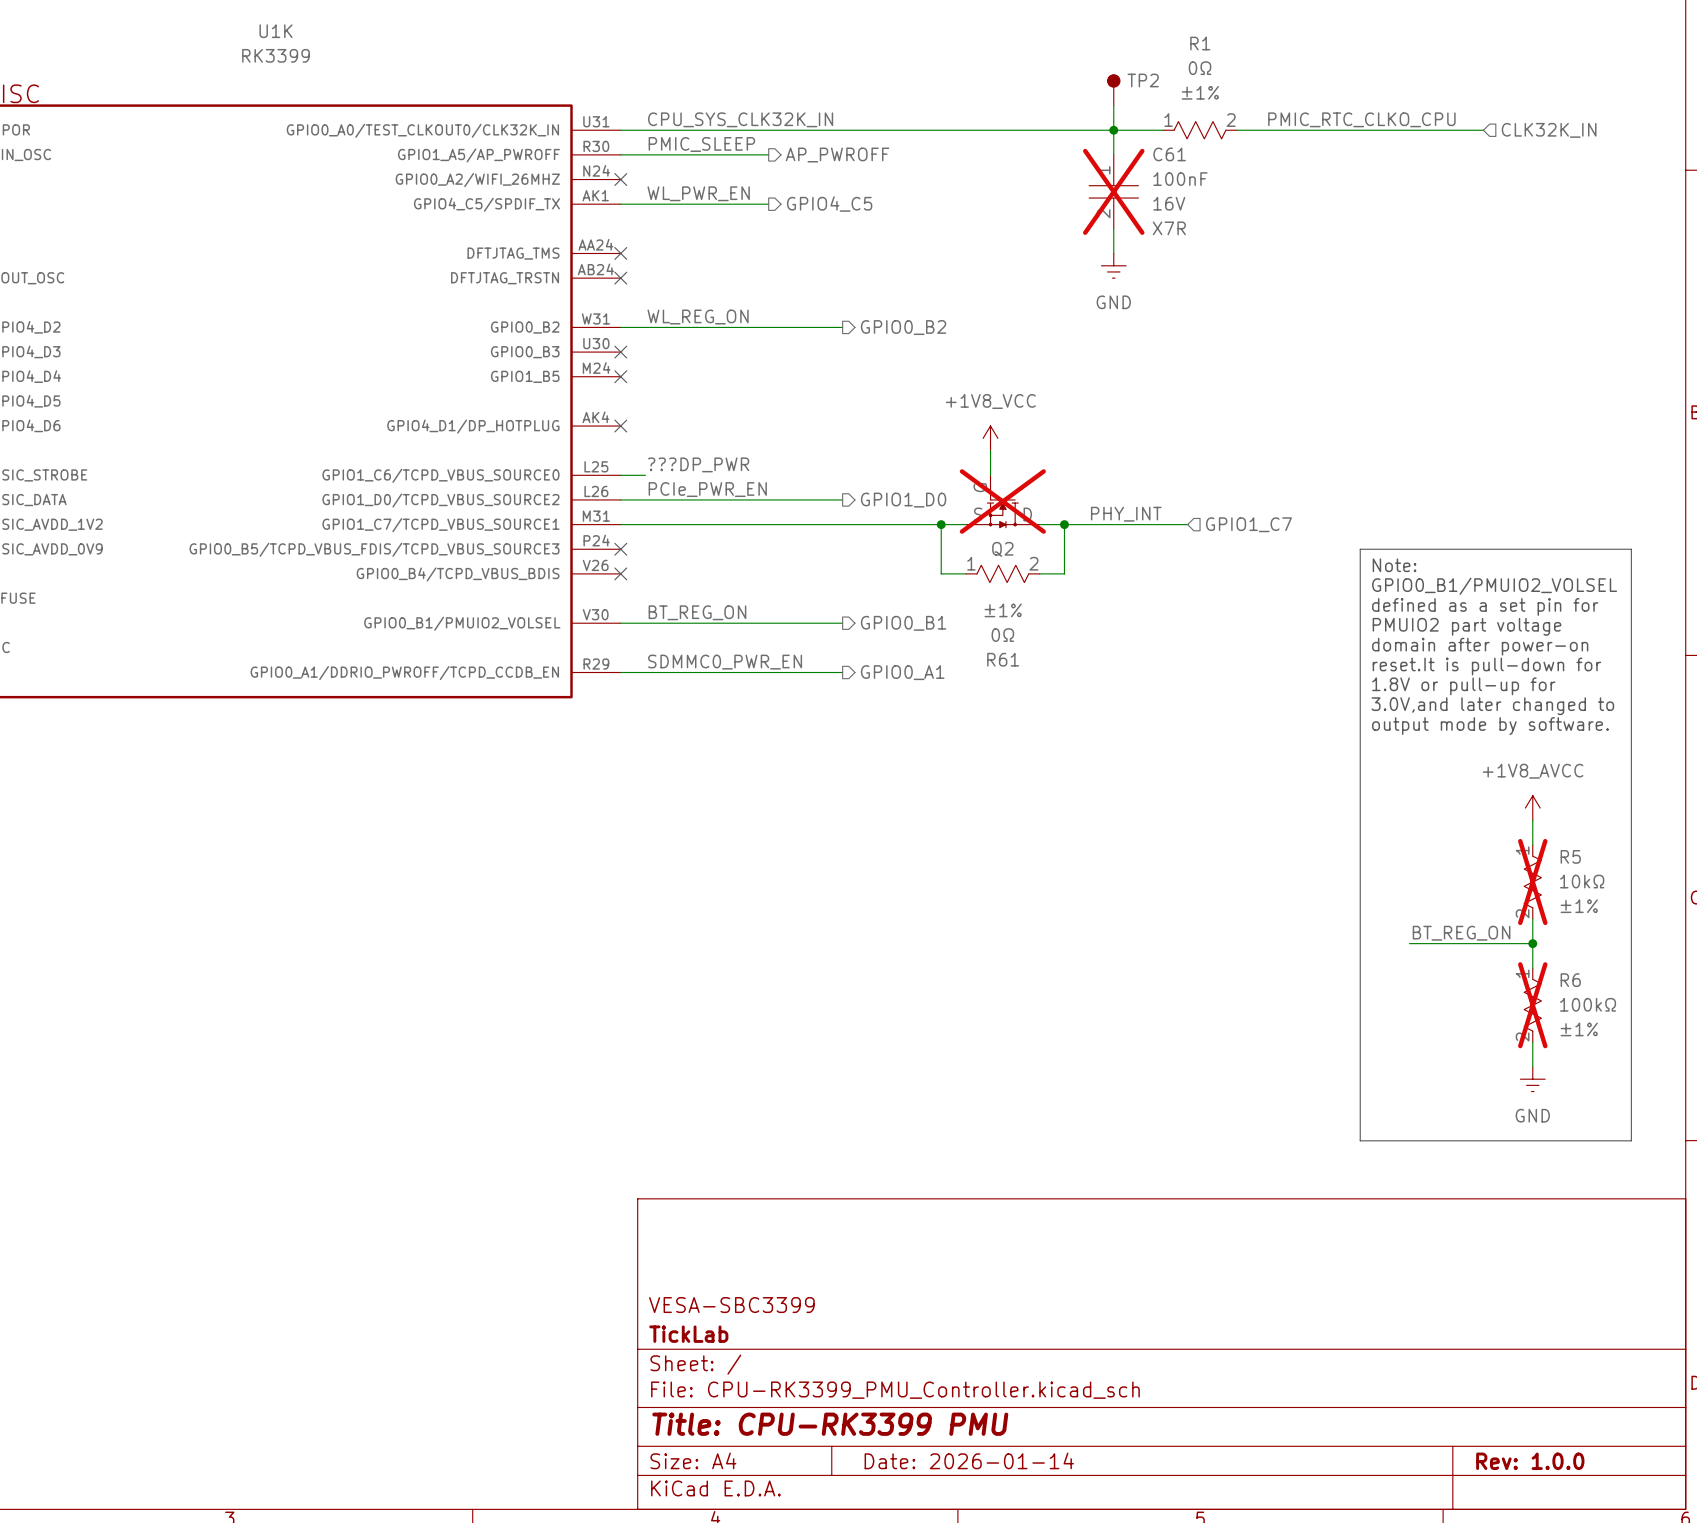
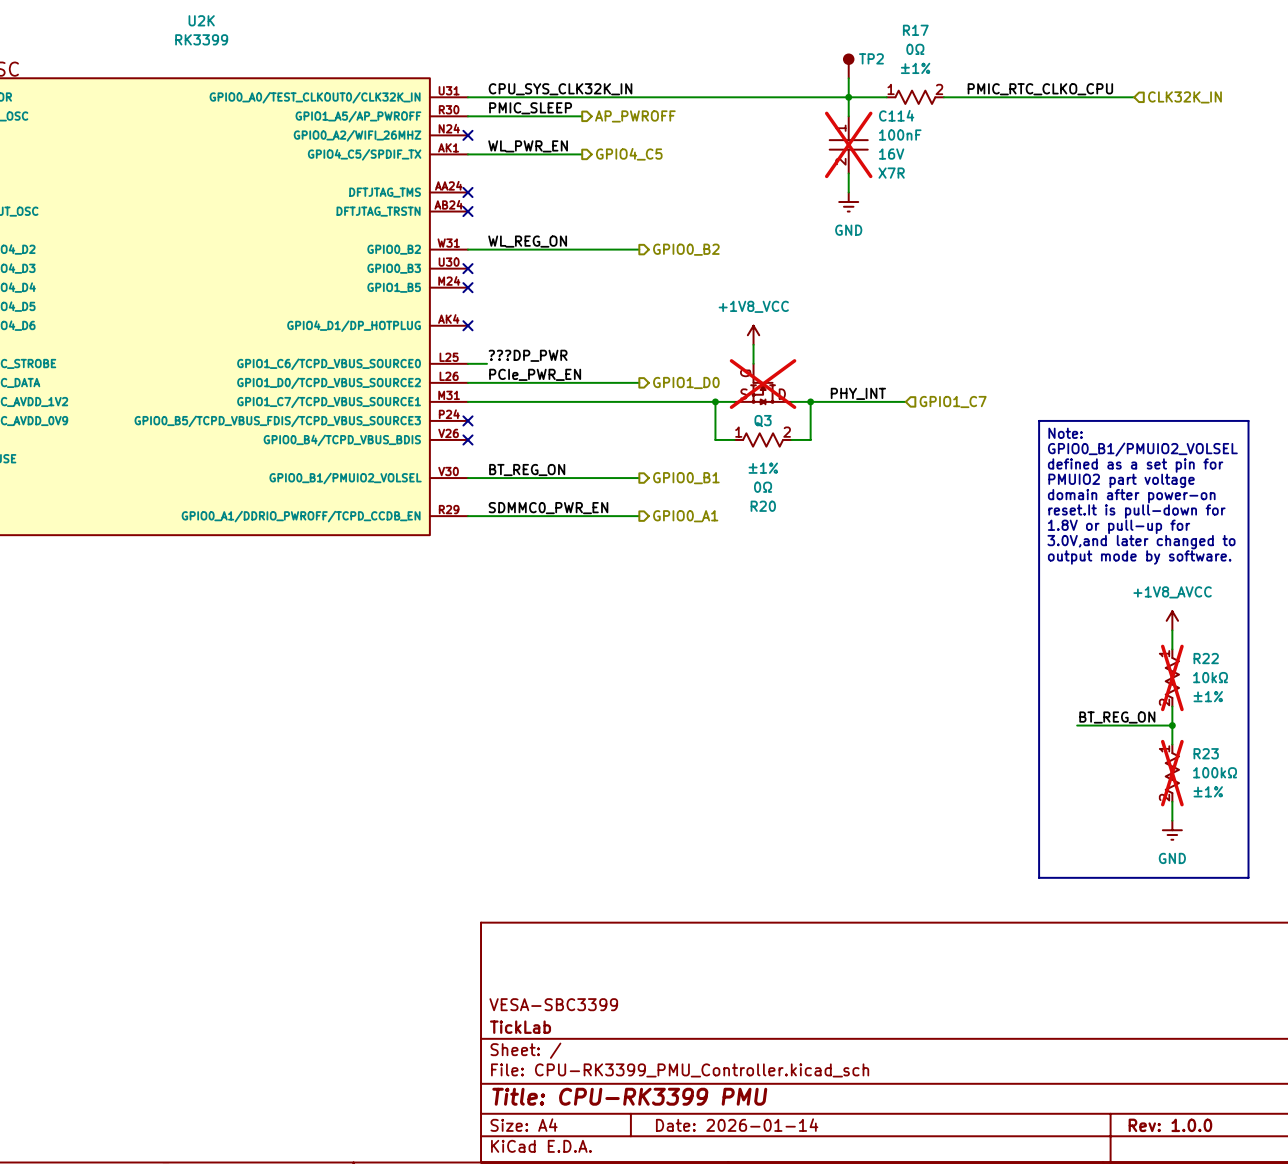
U1K name: U1K (276, 31) -> U2K (201, 20)
R1 name: R1 (1200, 43) -> R17 (915, 30)
C61 name: C61 (1169, 154) -> C114 (896, 115)
Q2 name: Q2 (1002, 549) -> Q3 (763, 421)
R61 name: R61 (1003, 659) -> R20 (763, 506)
R5 name: R5 (1570, 856) -> R22 (1206, 658)
R6 name: R6 (1570, 980) -> R23 (1206, 753)

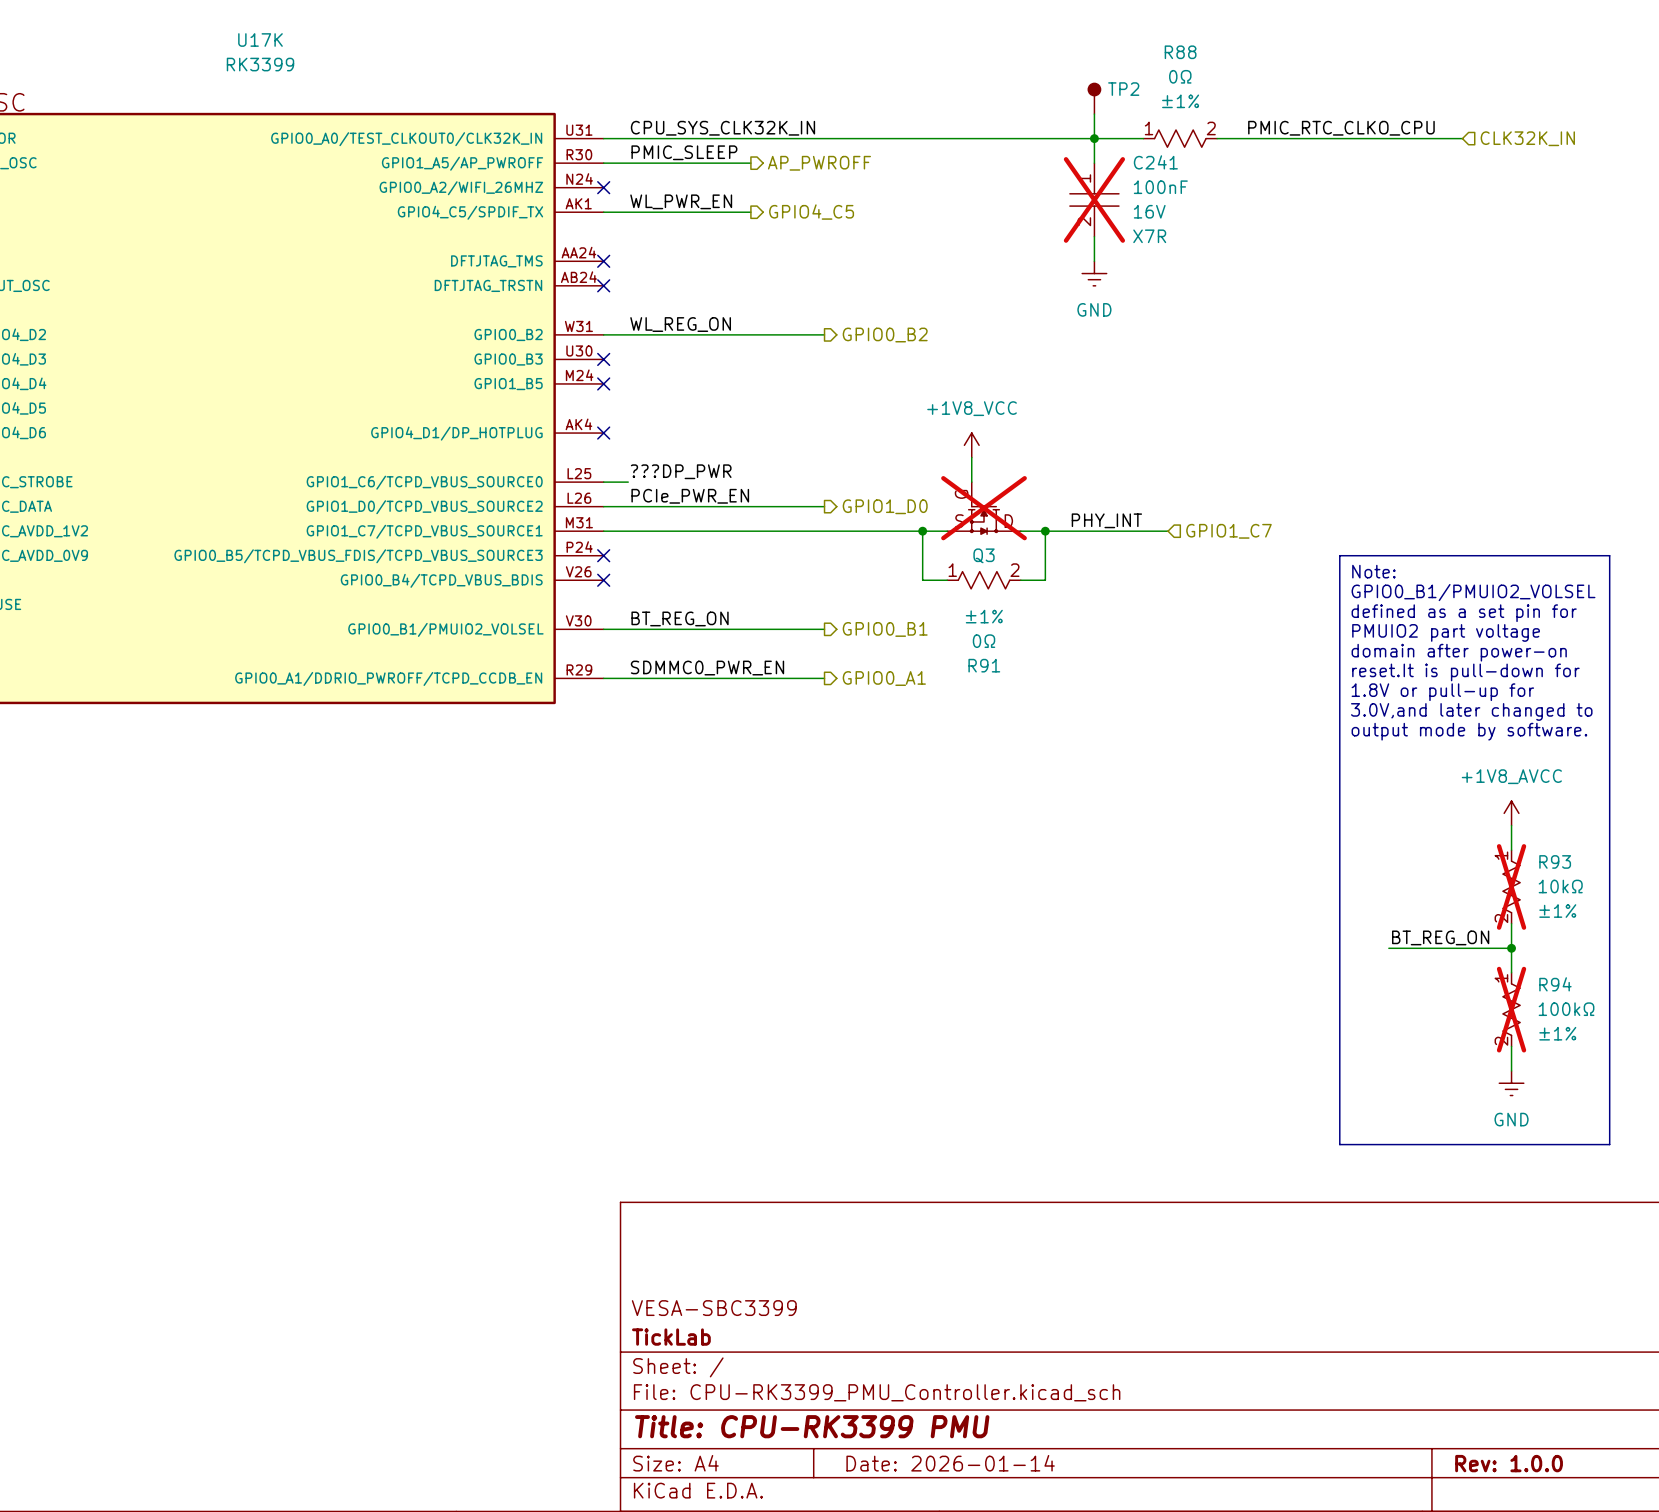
U2K name: U2K (201, 20) -> U17K (260, 40)
R17 name: R17 (915, 30) -> R88 (1180, 52)
C114 name: C114 (896, 115) -> C241 (1155, 162)
R20 name: R20 (763, 506) -> R91 (984, 665)
R22 name: R22 (1206, 658) -> R93 (1555, 861)
R23 name: R23 (1206, 753) -> R94 (1555, 984)

